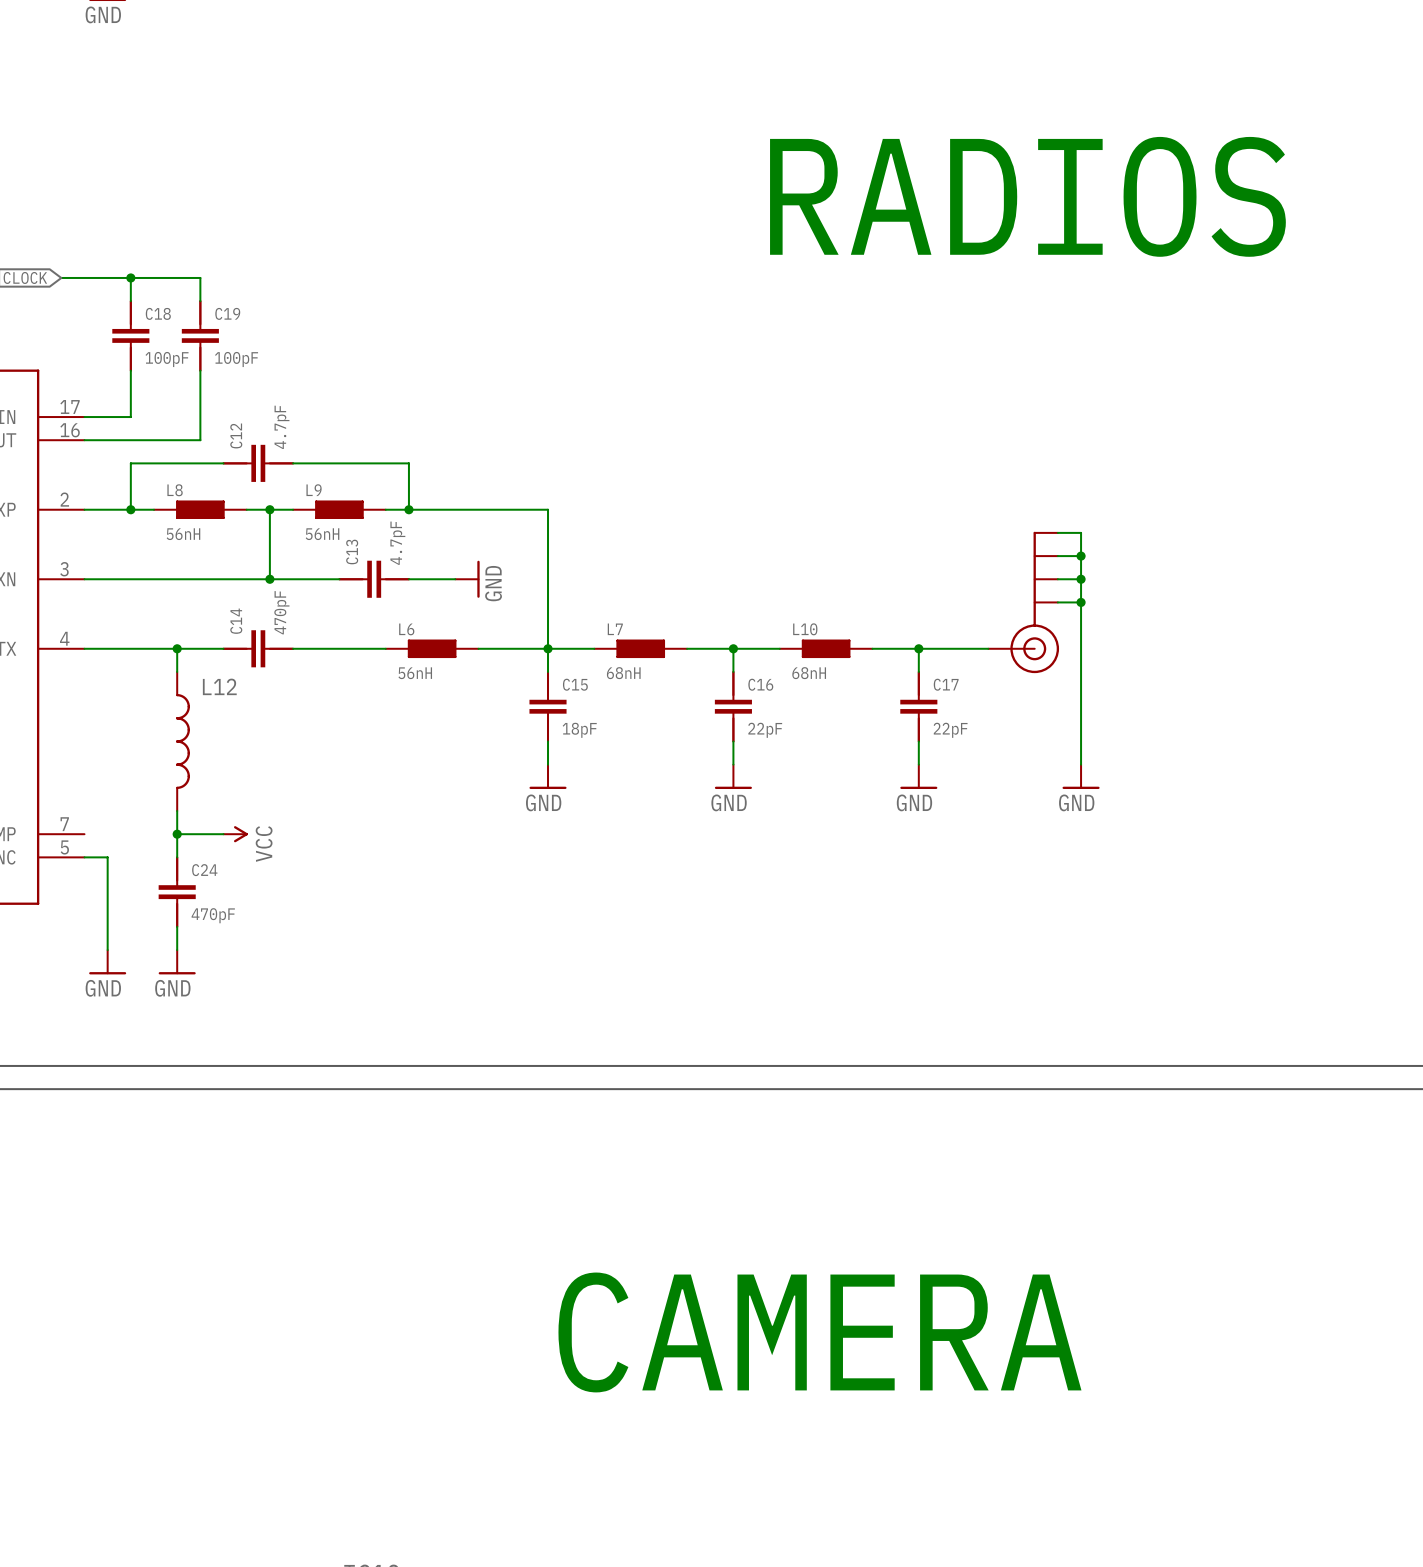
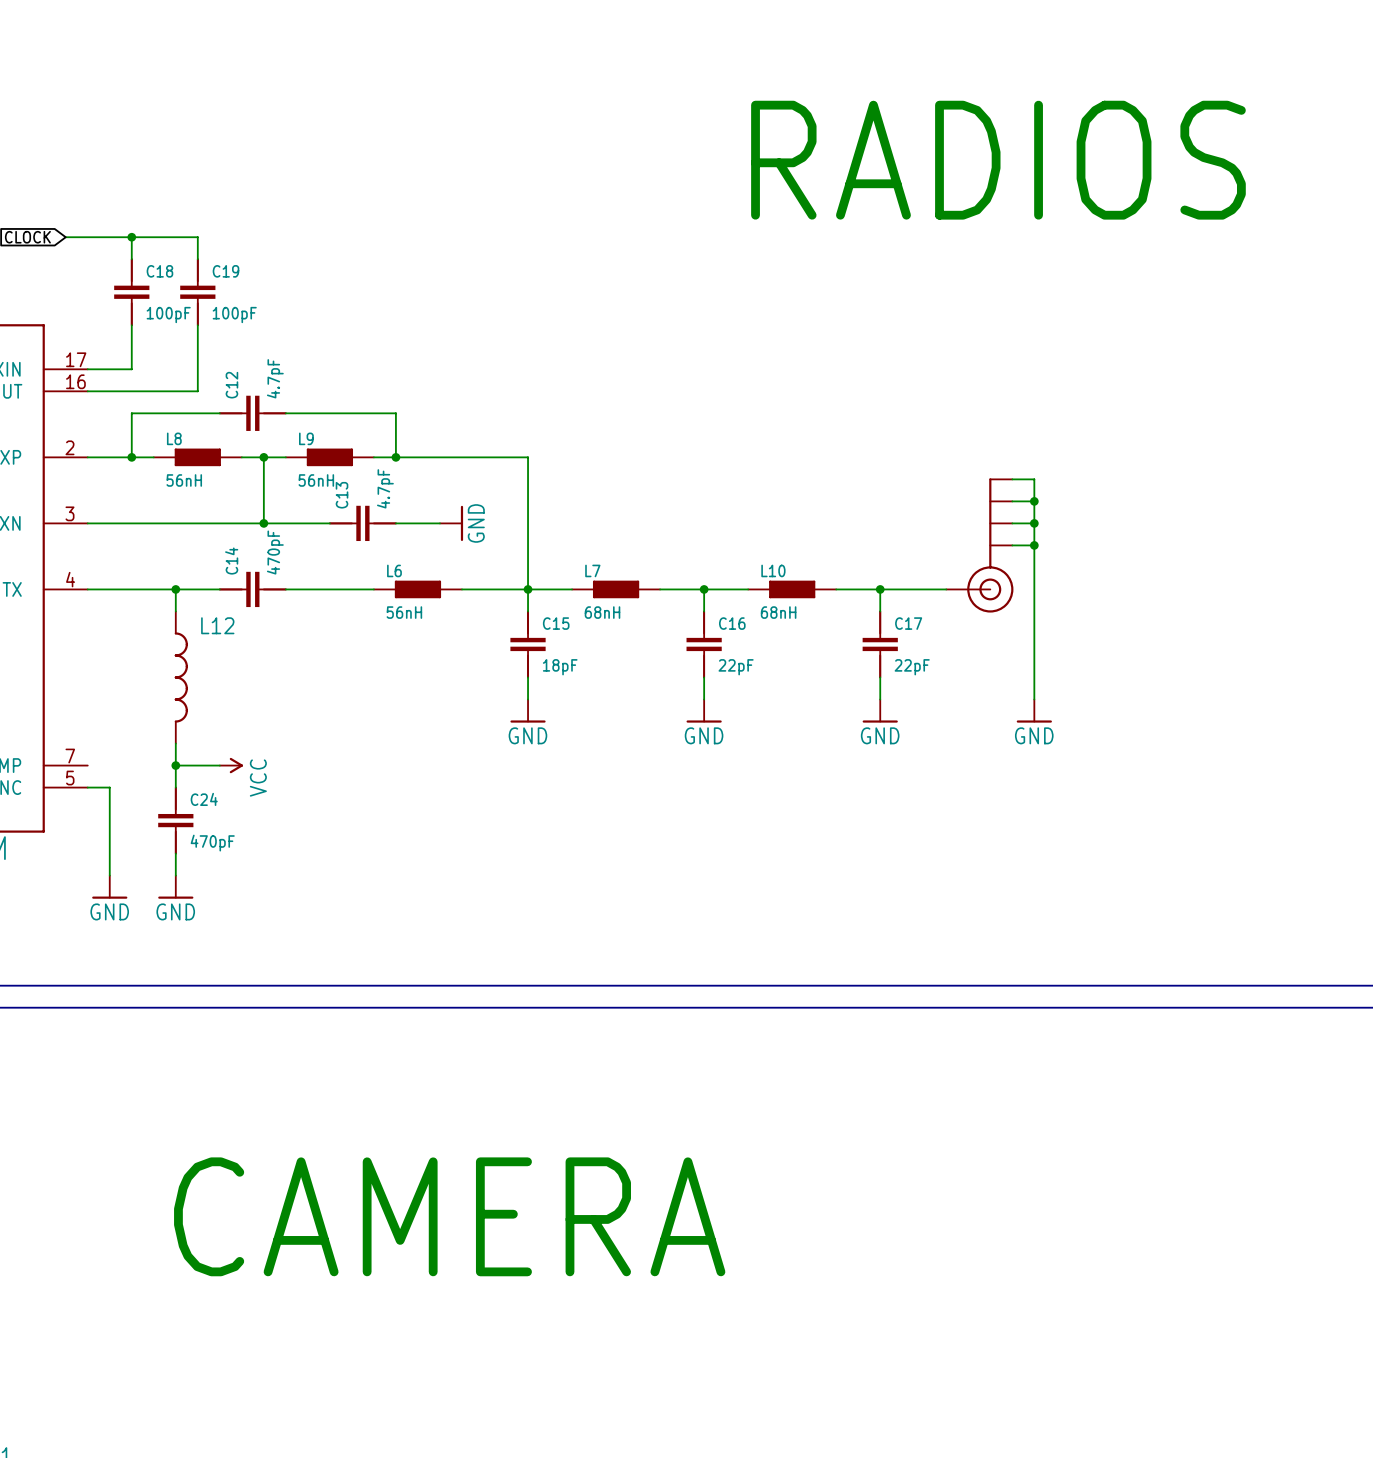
text: none -> CAMERA (449, 1216)
text: CAMERA (819, 1332) -> none

